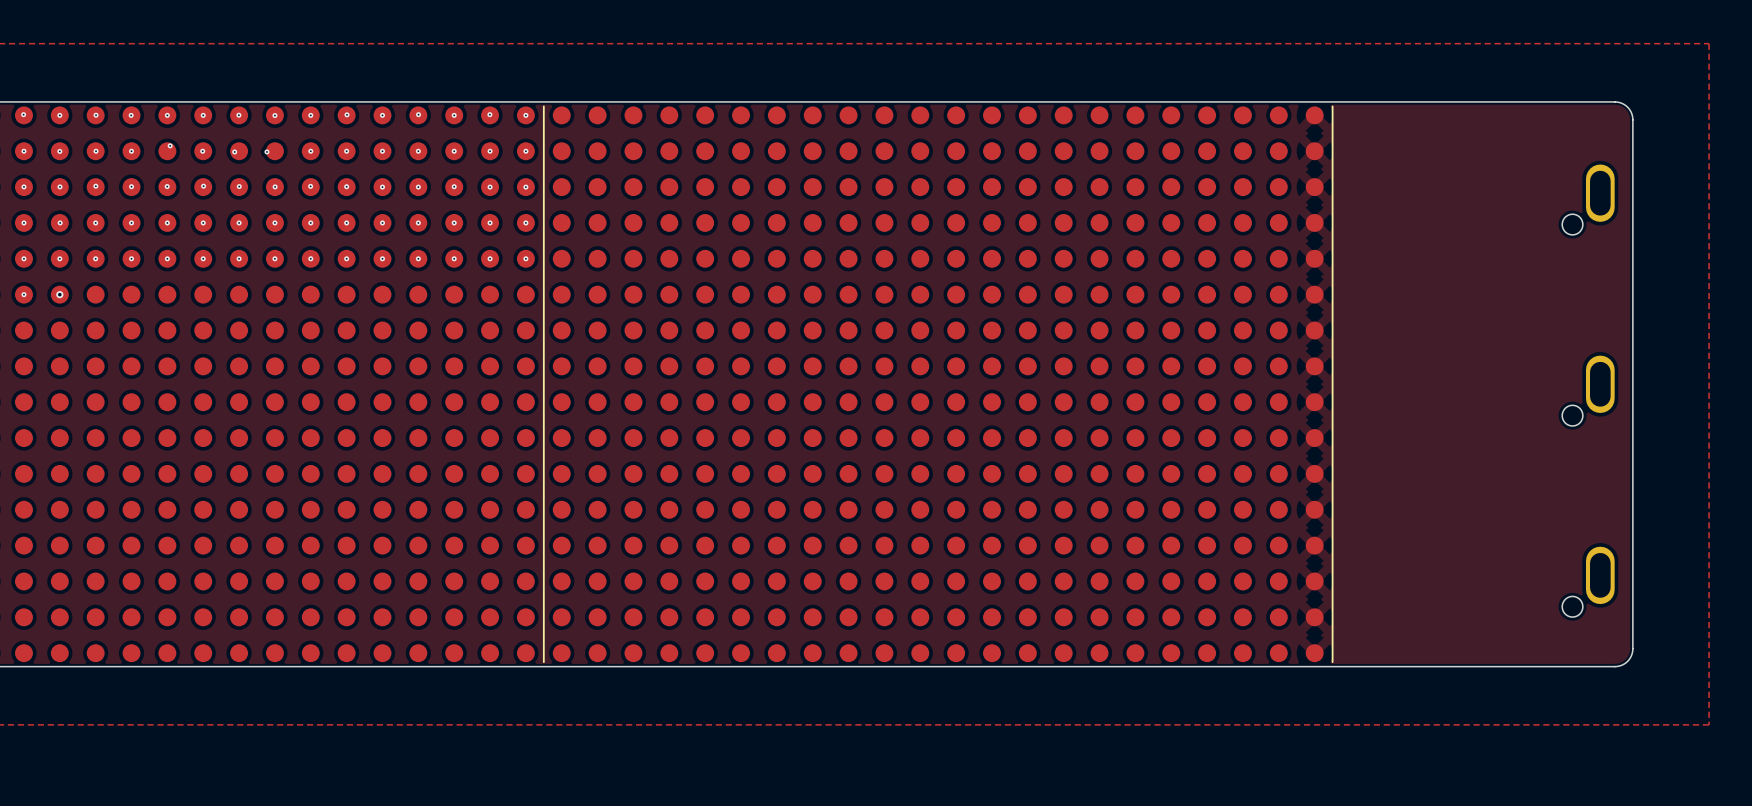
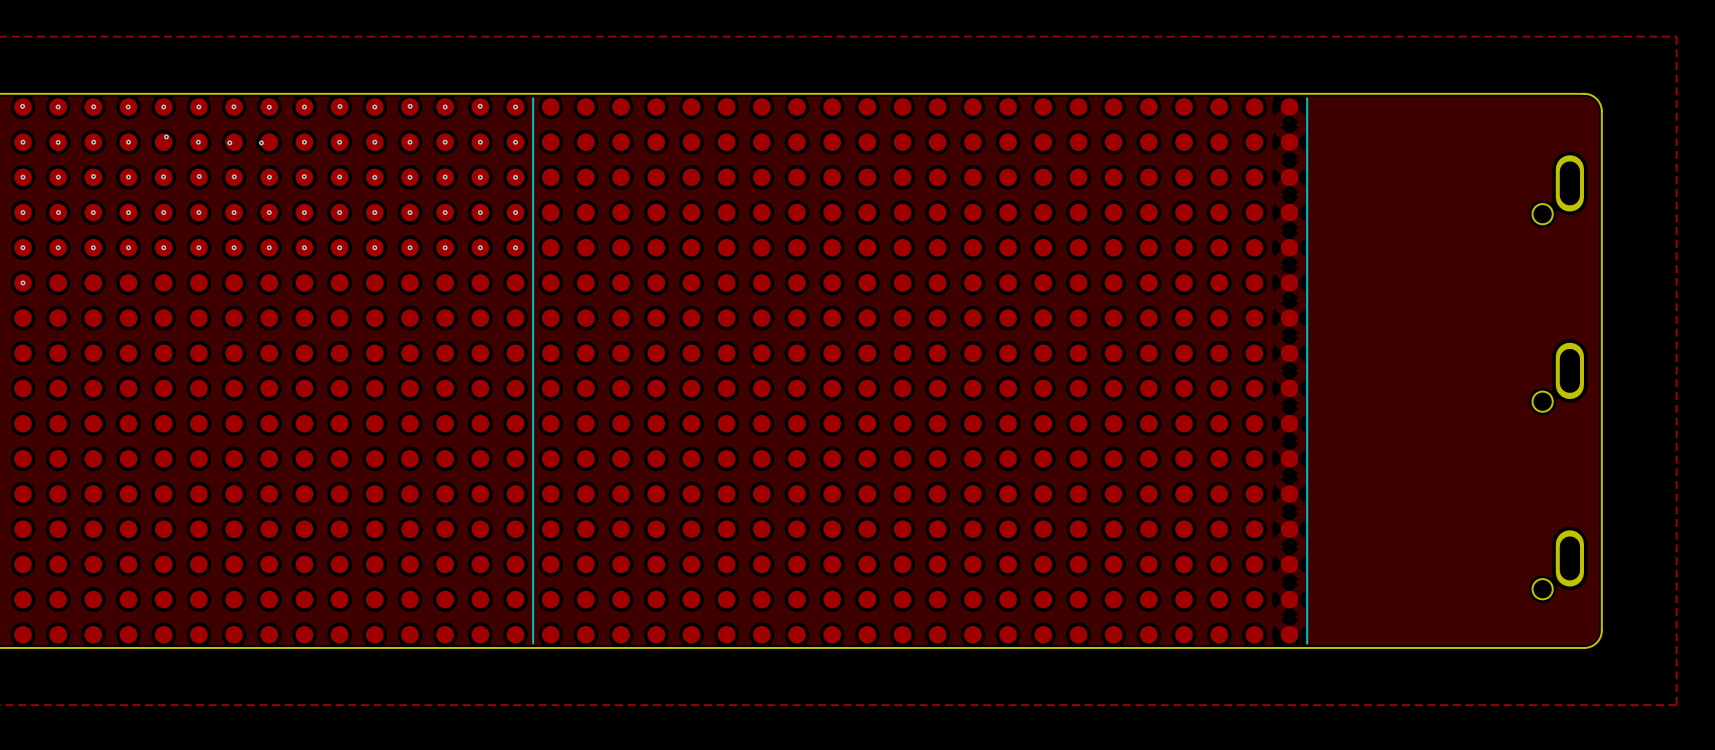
via: (59, 294) -> none

